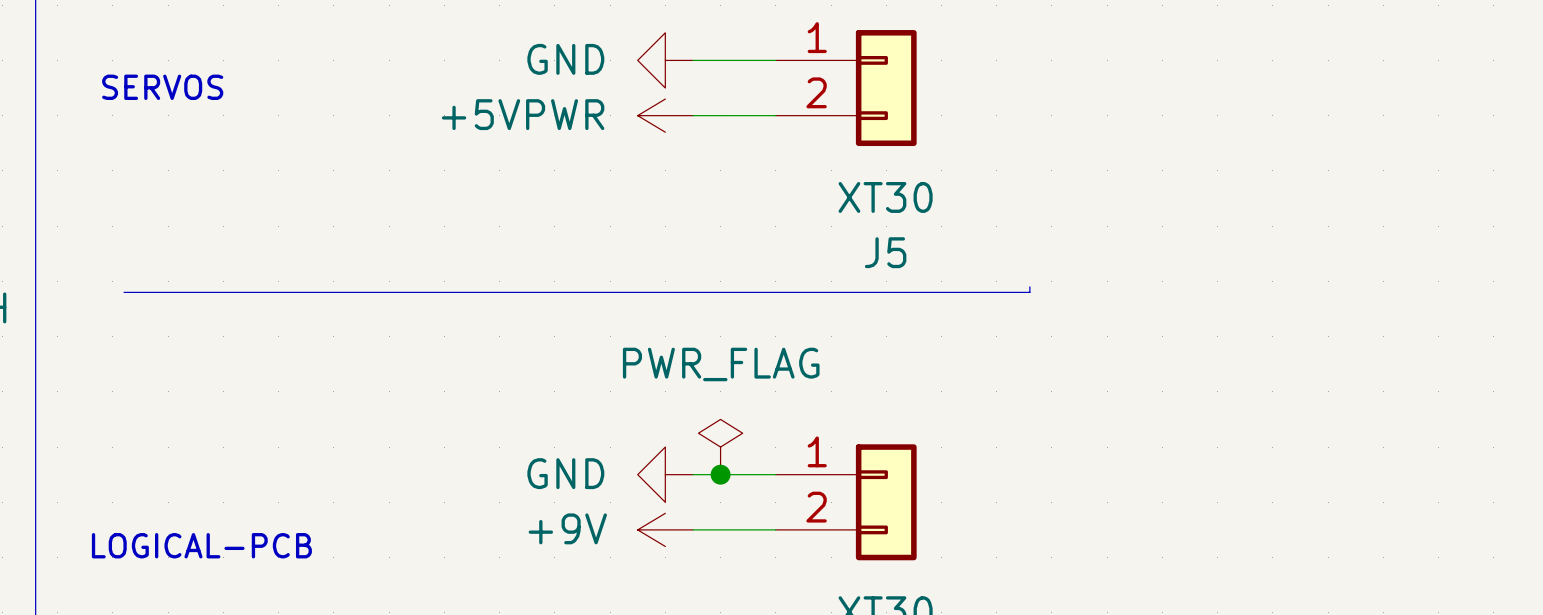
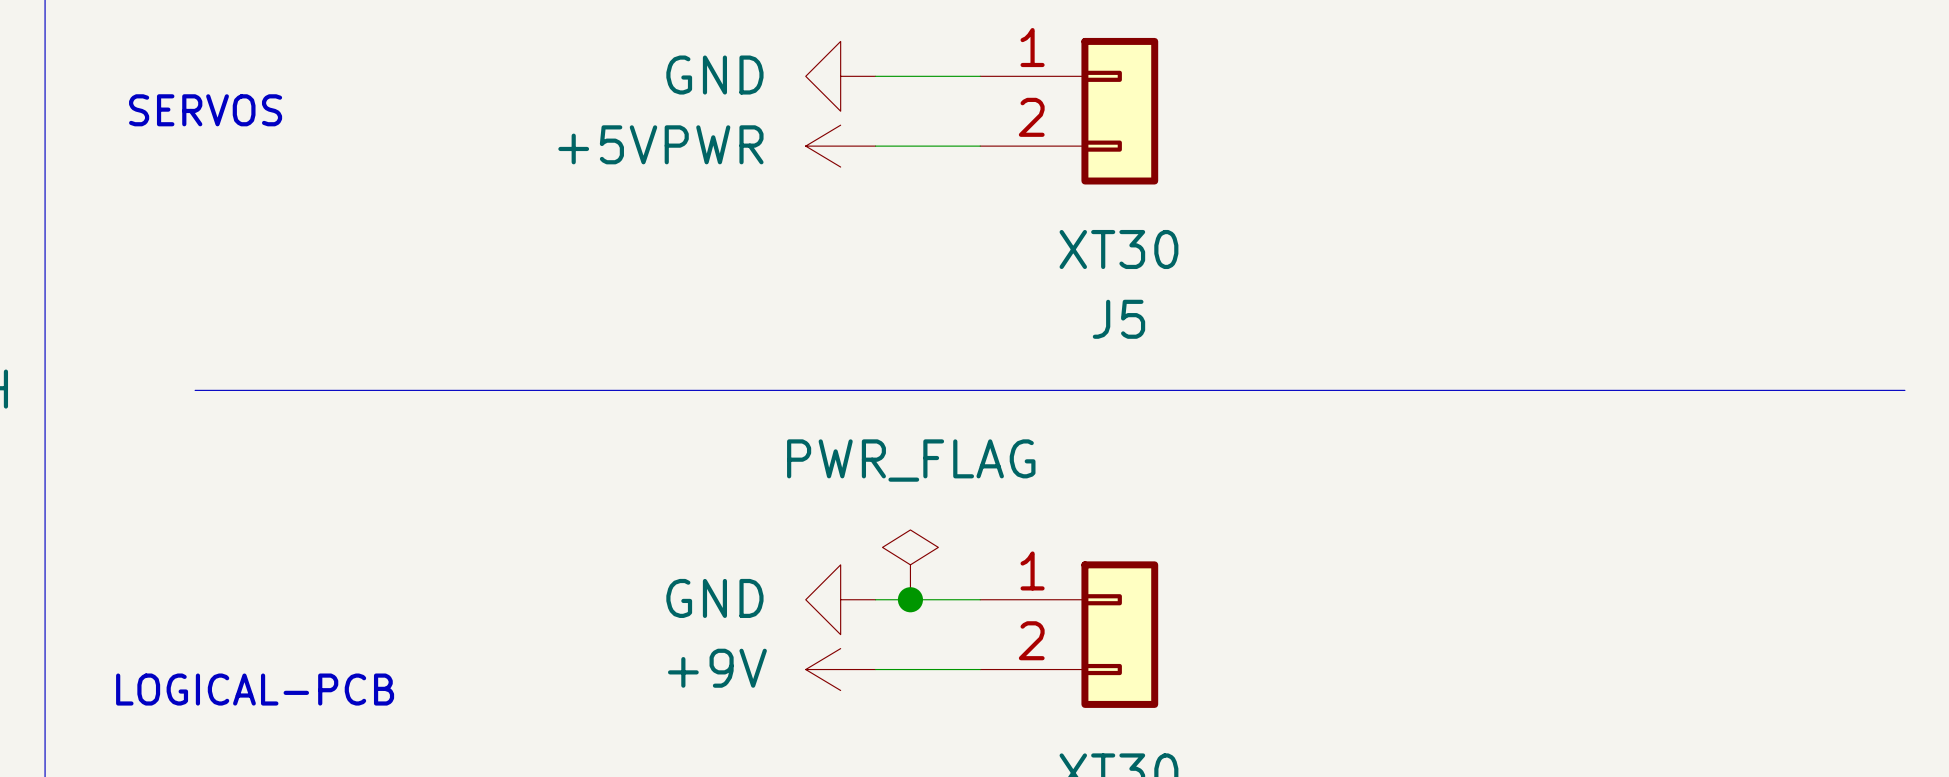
line: (1029, 286) (1029, 292) (124, 292) -> none
line: none -> (195, 390) (1904, 390)

